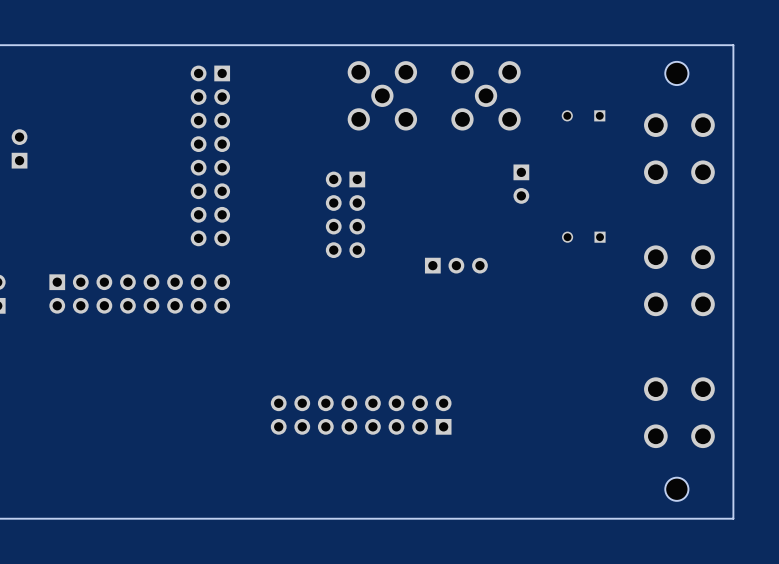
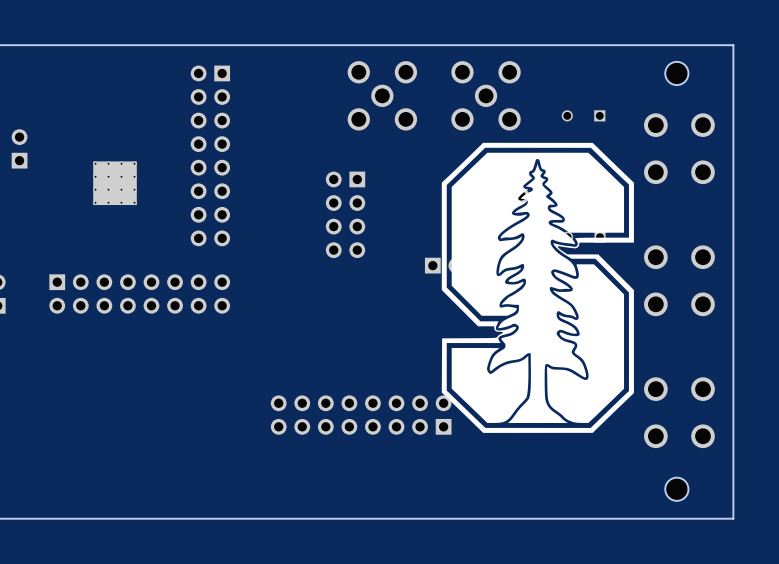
drawing: none -> [441, 142, 634, 433]
part: none -> (115, 183)

